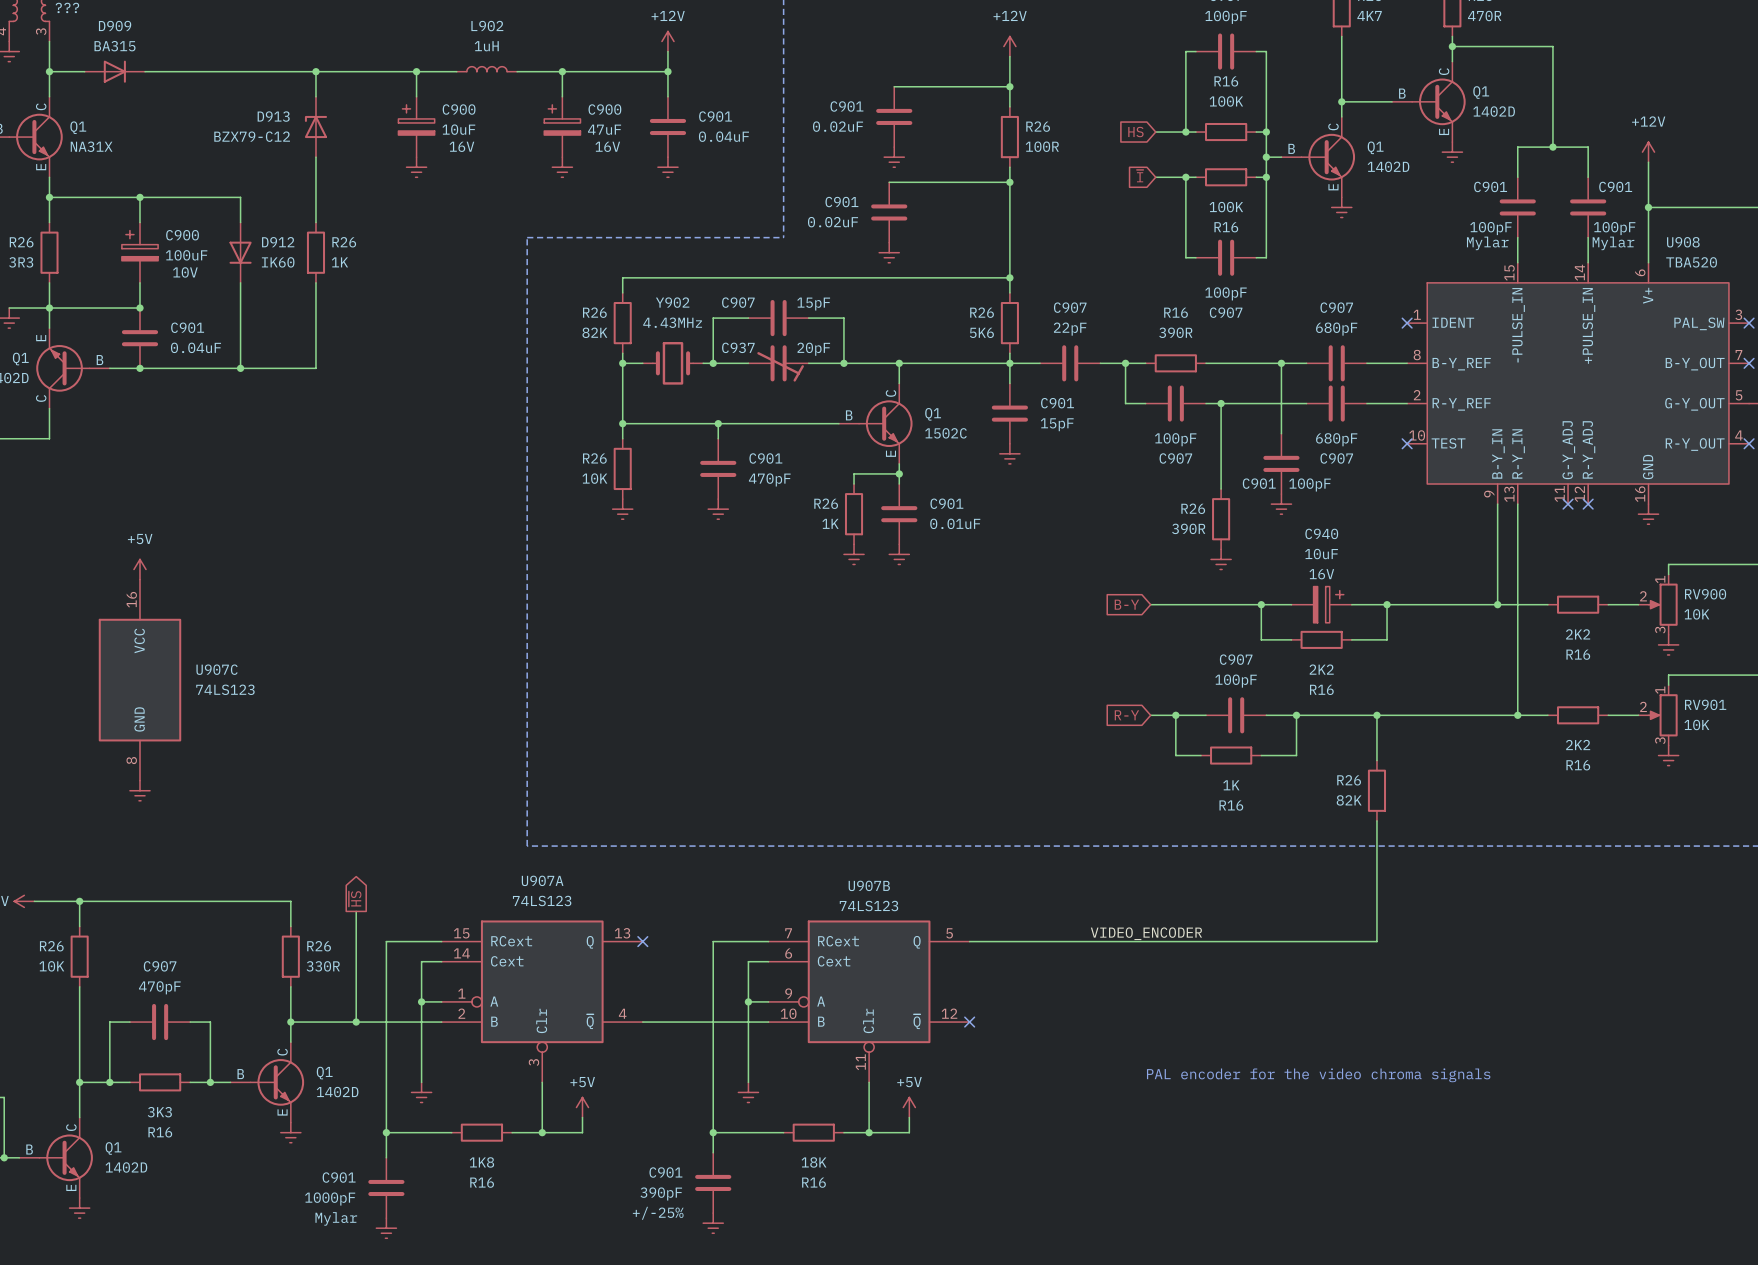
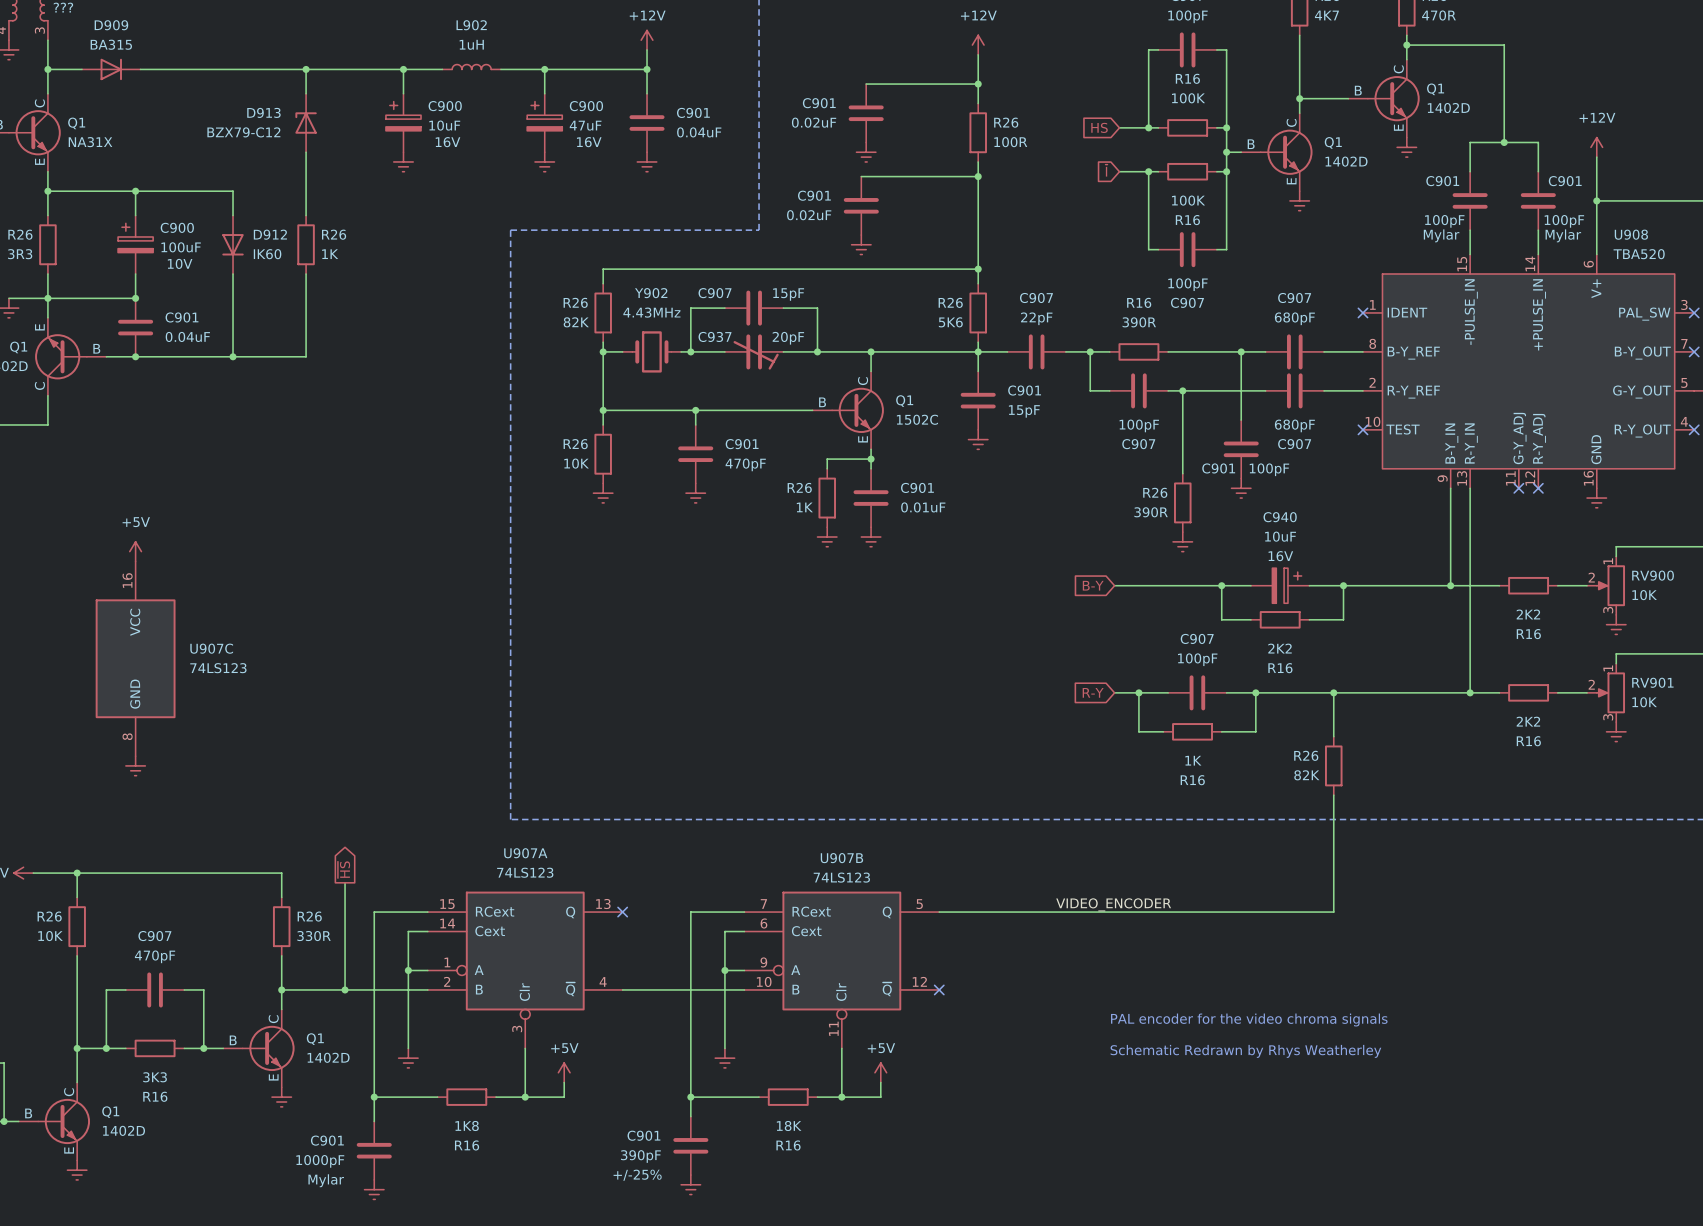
text position: PAL encoder for the video chroma signals (1318, 1075) -> PAL encoder for the video chroma signals (1249, 1020)
text: none -> Schematic Redrawn by Rhys Weatherley (1245, 1051)

